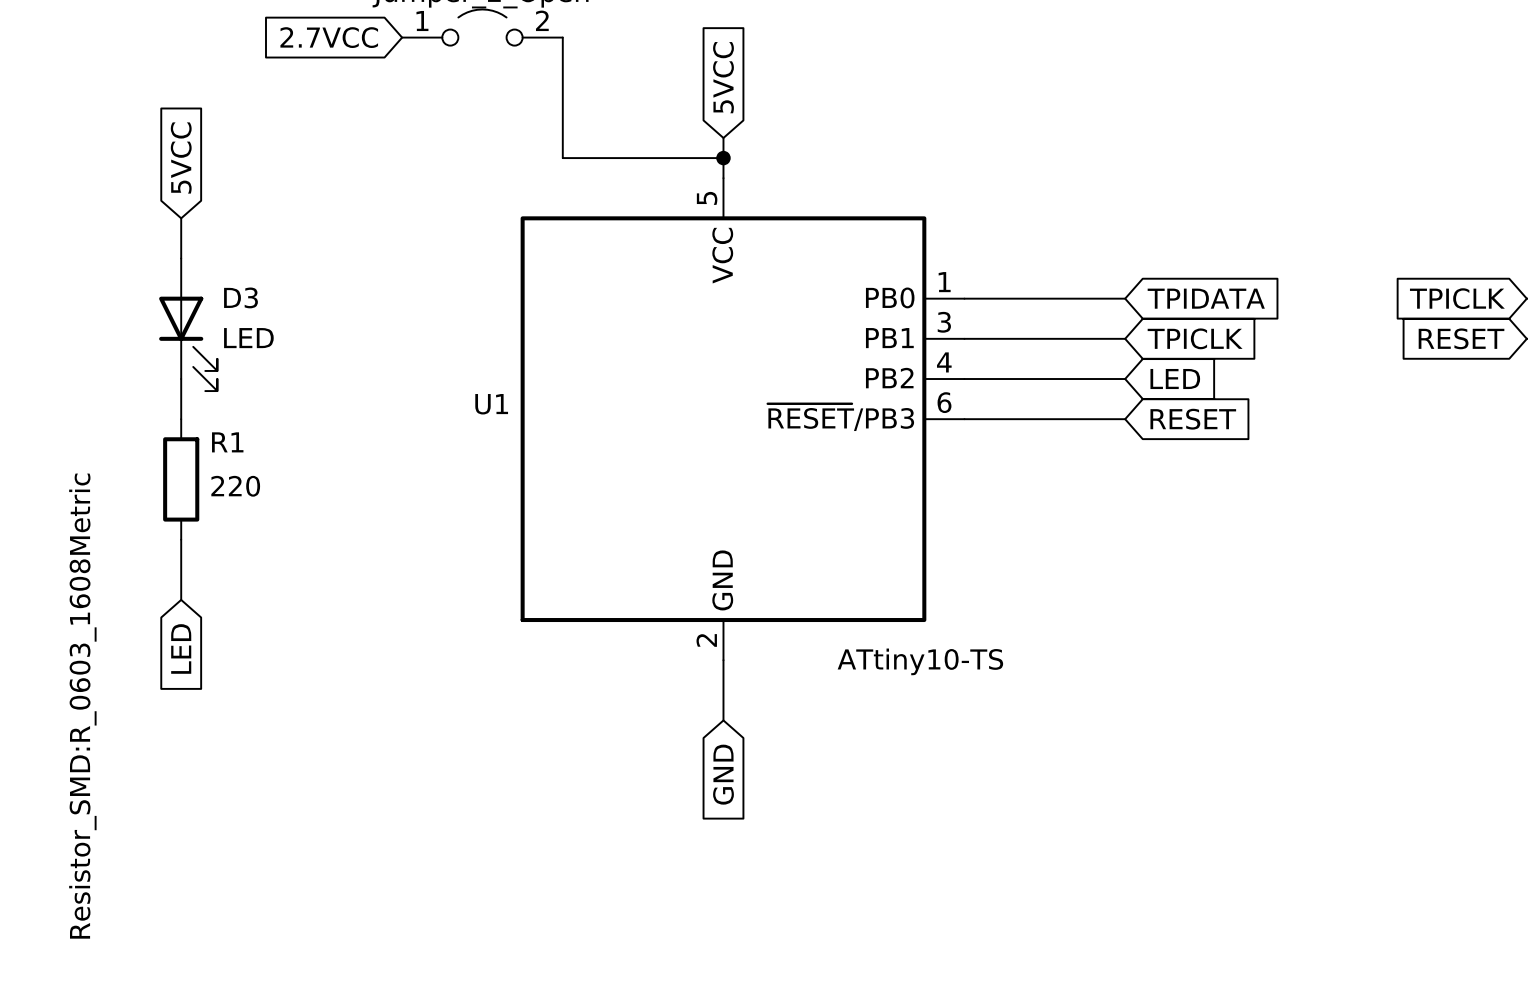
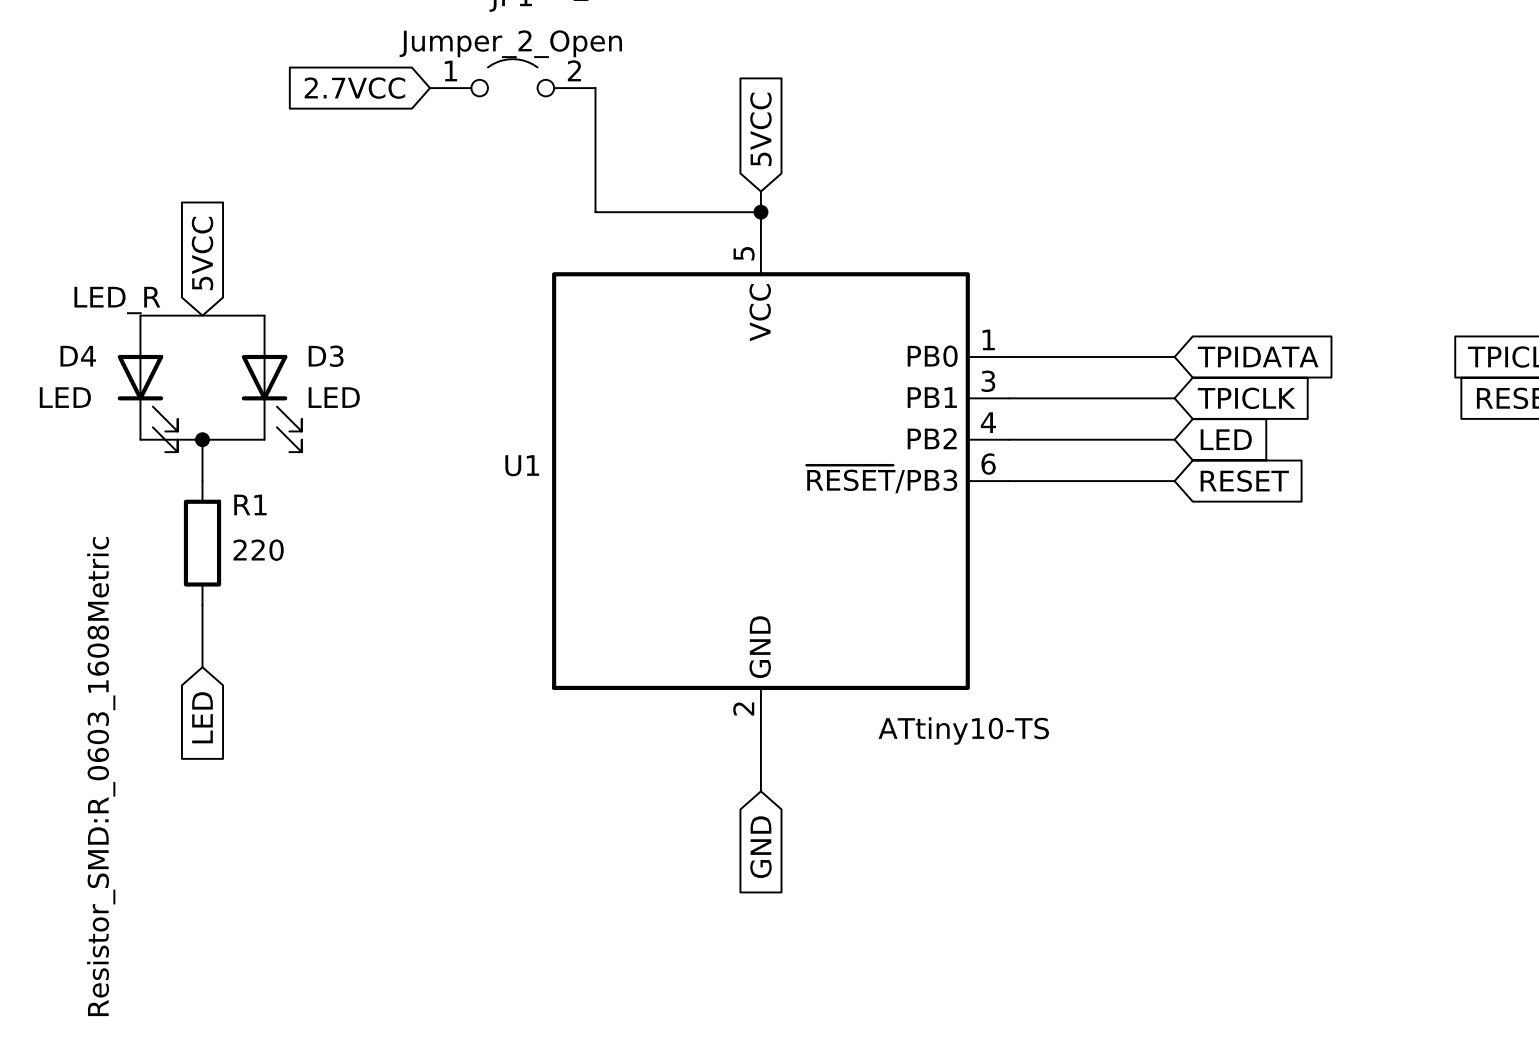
global label position: 5VCC (181, 158) -> 5VCC (202, 253)
wire: (181, 218) (181, 258) -> none
label: none -> LED_R (117, 300)
wire: none -> (140, 315) (264, 315)
D4: none -> LED (147, 383)
D3 position: (188, 324) -> (271, 383)
wire: none -> (140, 439) (264, 439)
junction: none -> (202, 439)

